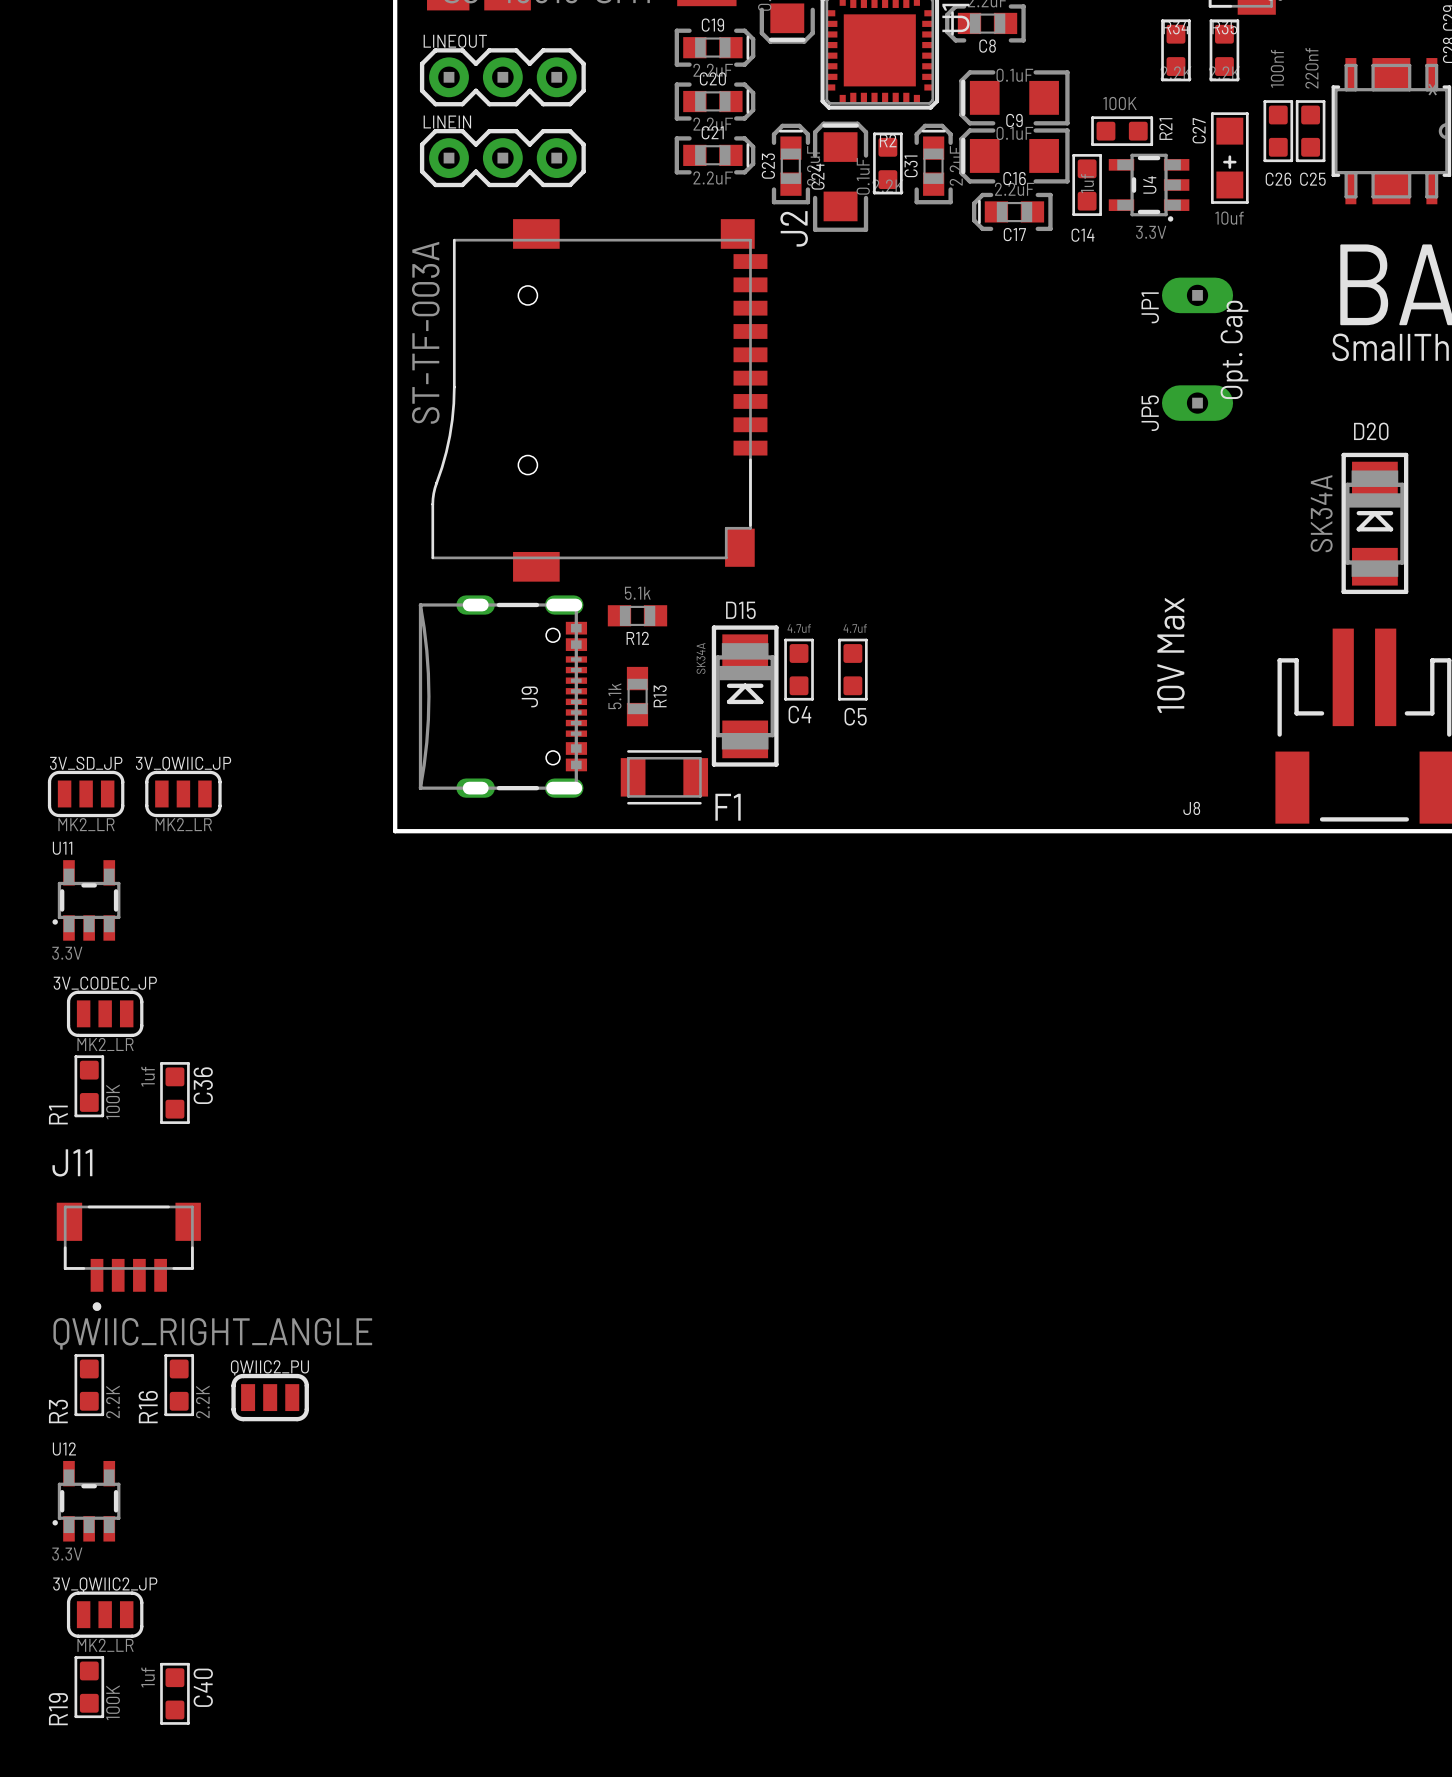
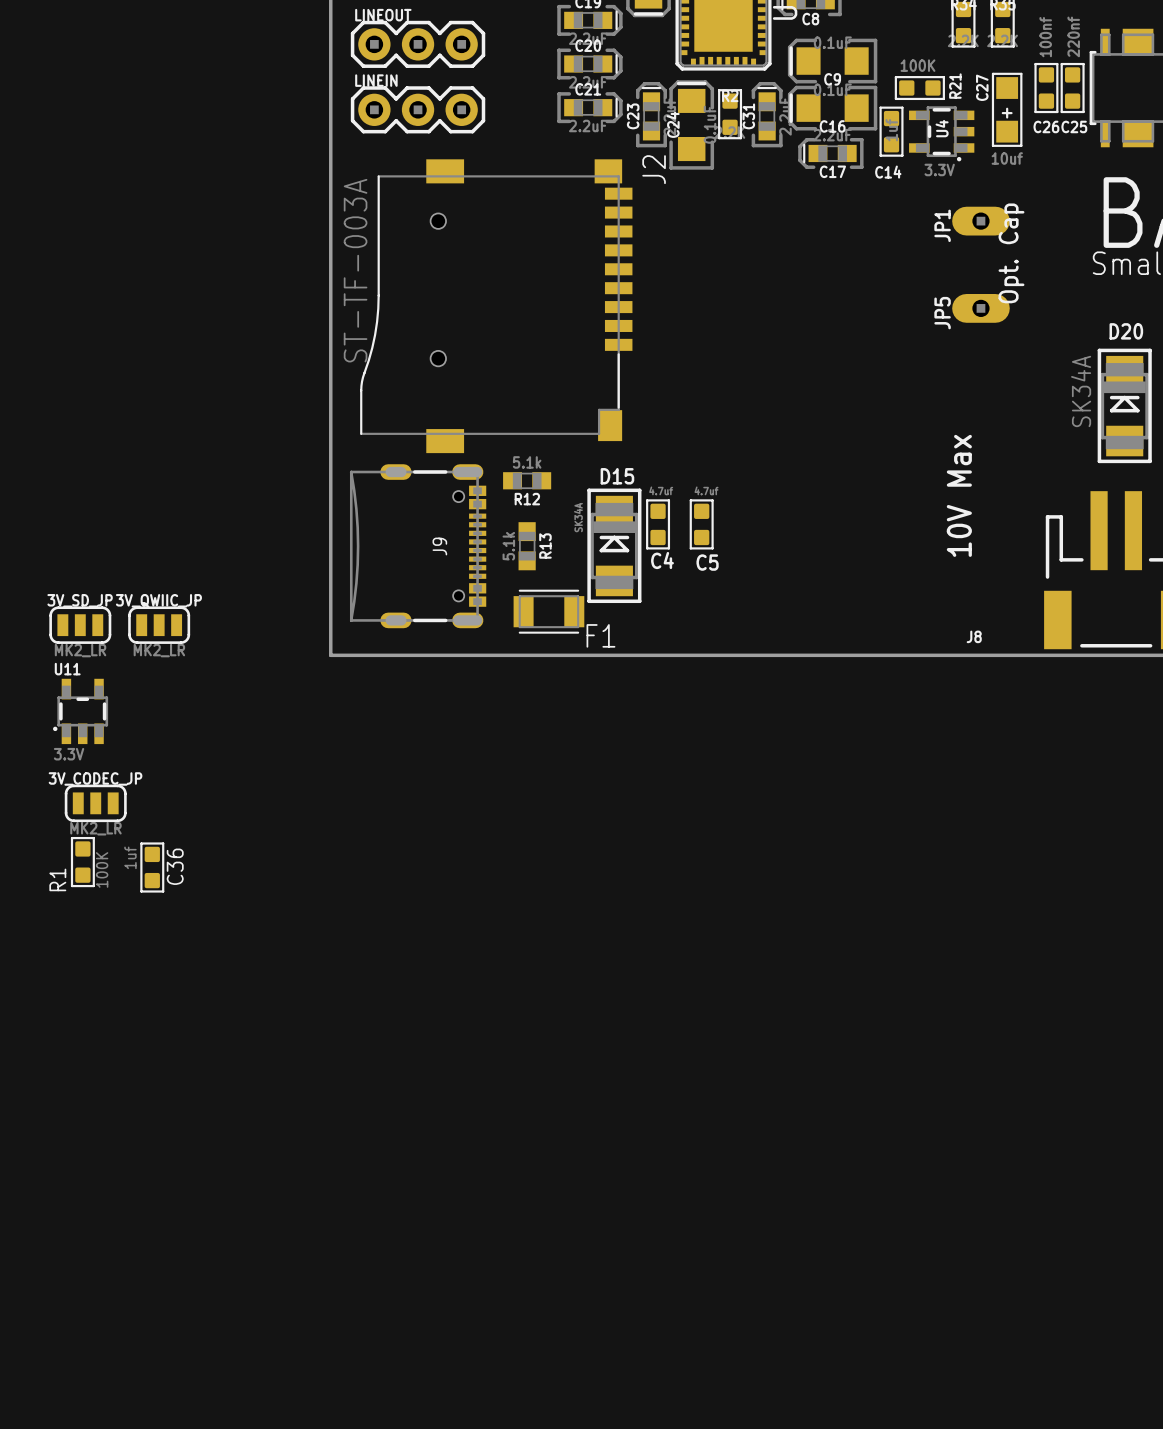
J11: QWIIC_RIGHT_ANGLE (128, 1256) -> none
R3: 2.2K (89, 1385) -> none
R16: 2.2K (179, 1385) -> none
QWIIC2_PU: (270, 1397) -> none
U12: 3.3V (86, 1501) -> none
3V_QWIIC2_JP: MK2_LR (105, 1614) -> none
R19: 100K (89, 1687) -> none
C40: 1uf (174, 1693) -> none

